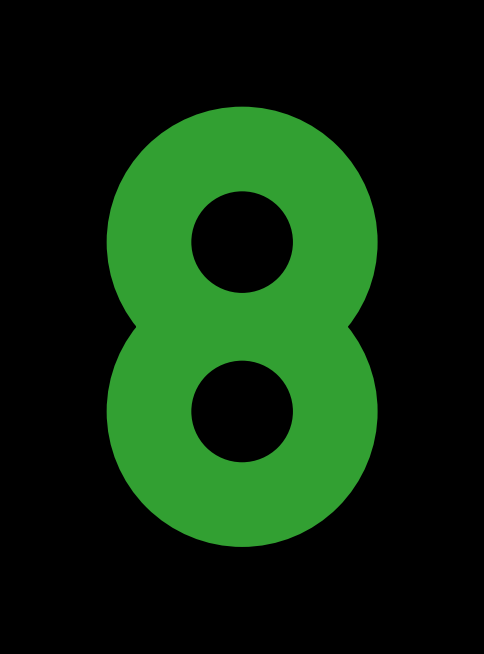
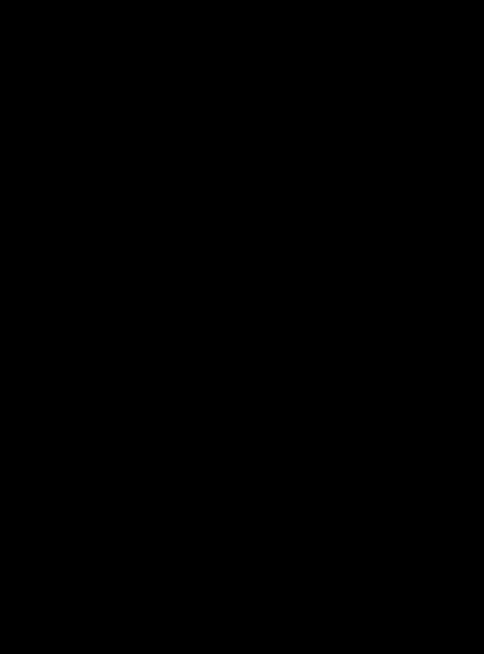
part: (242, 326) -> none

